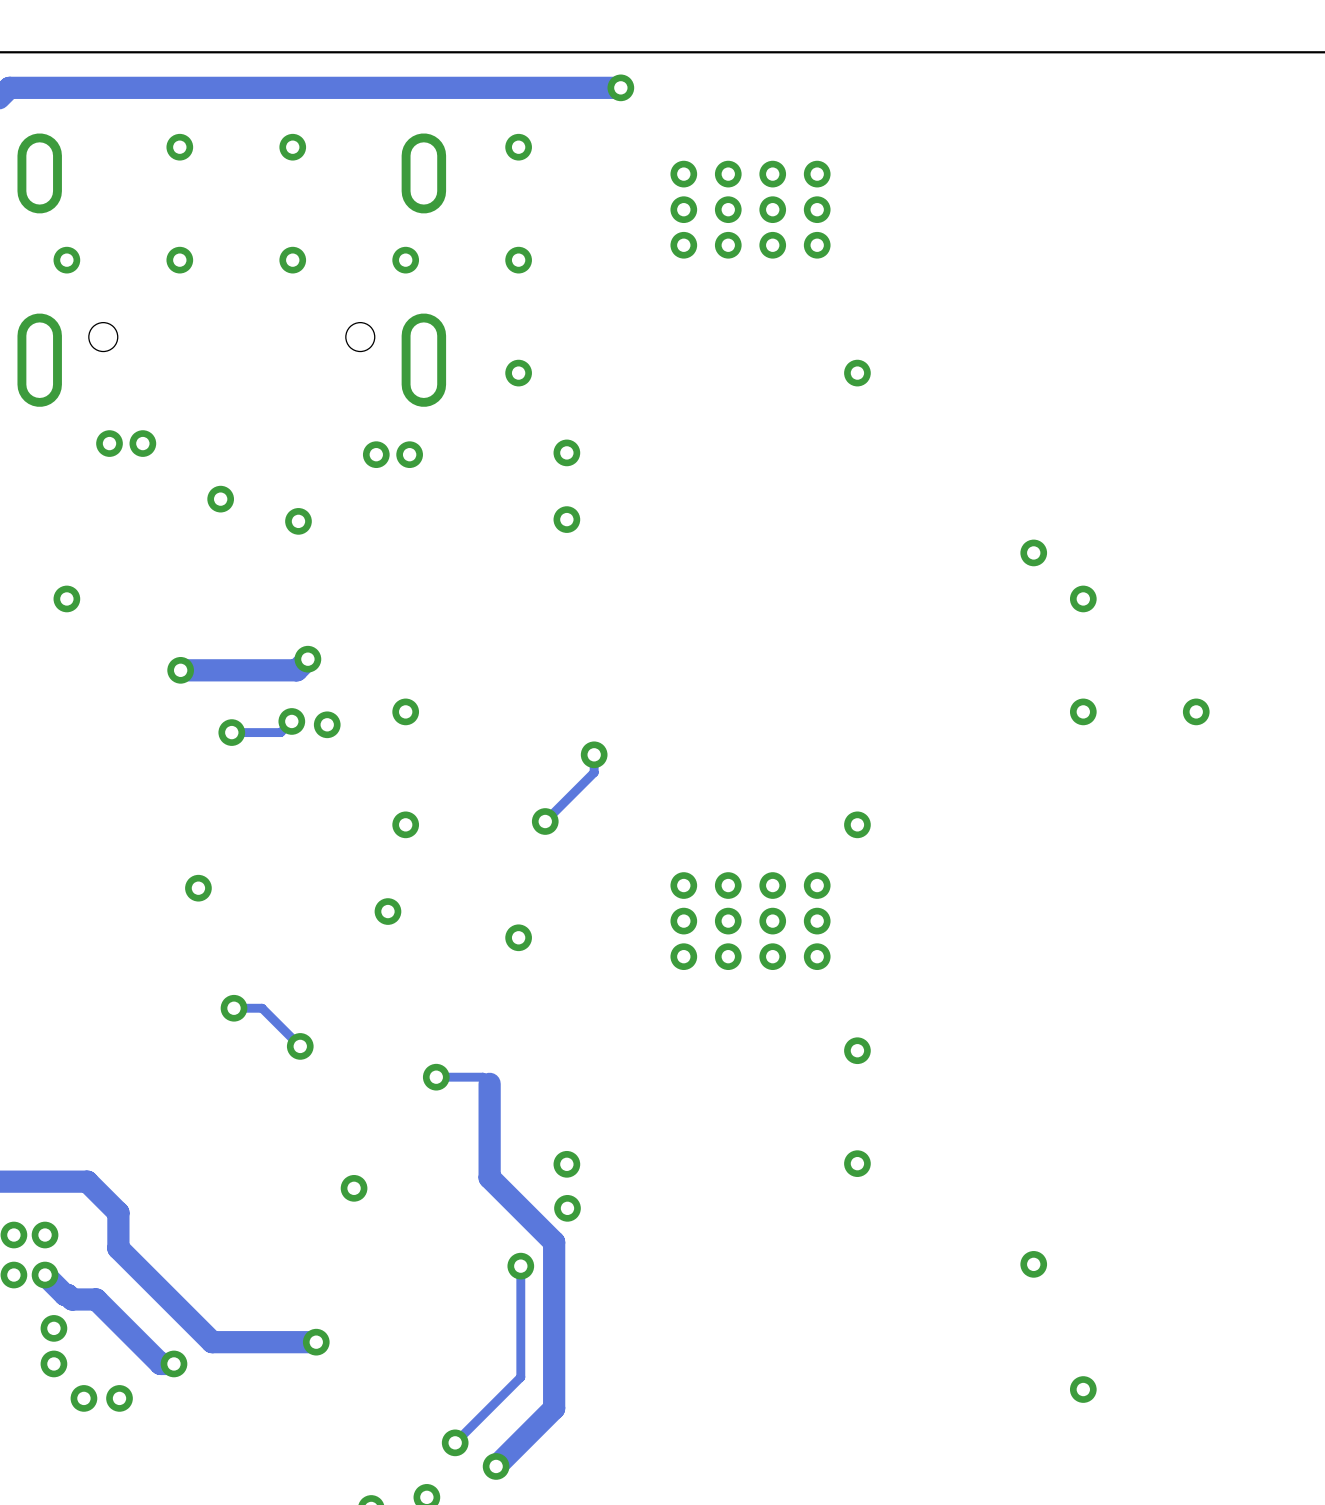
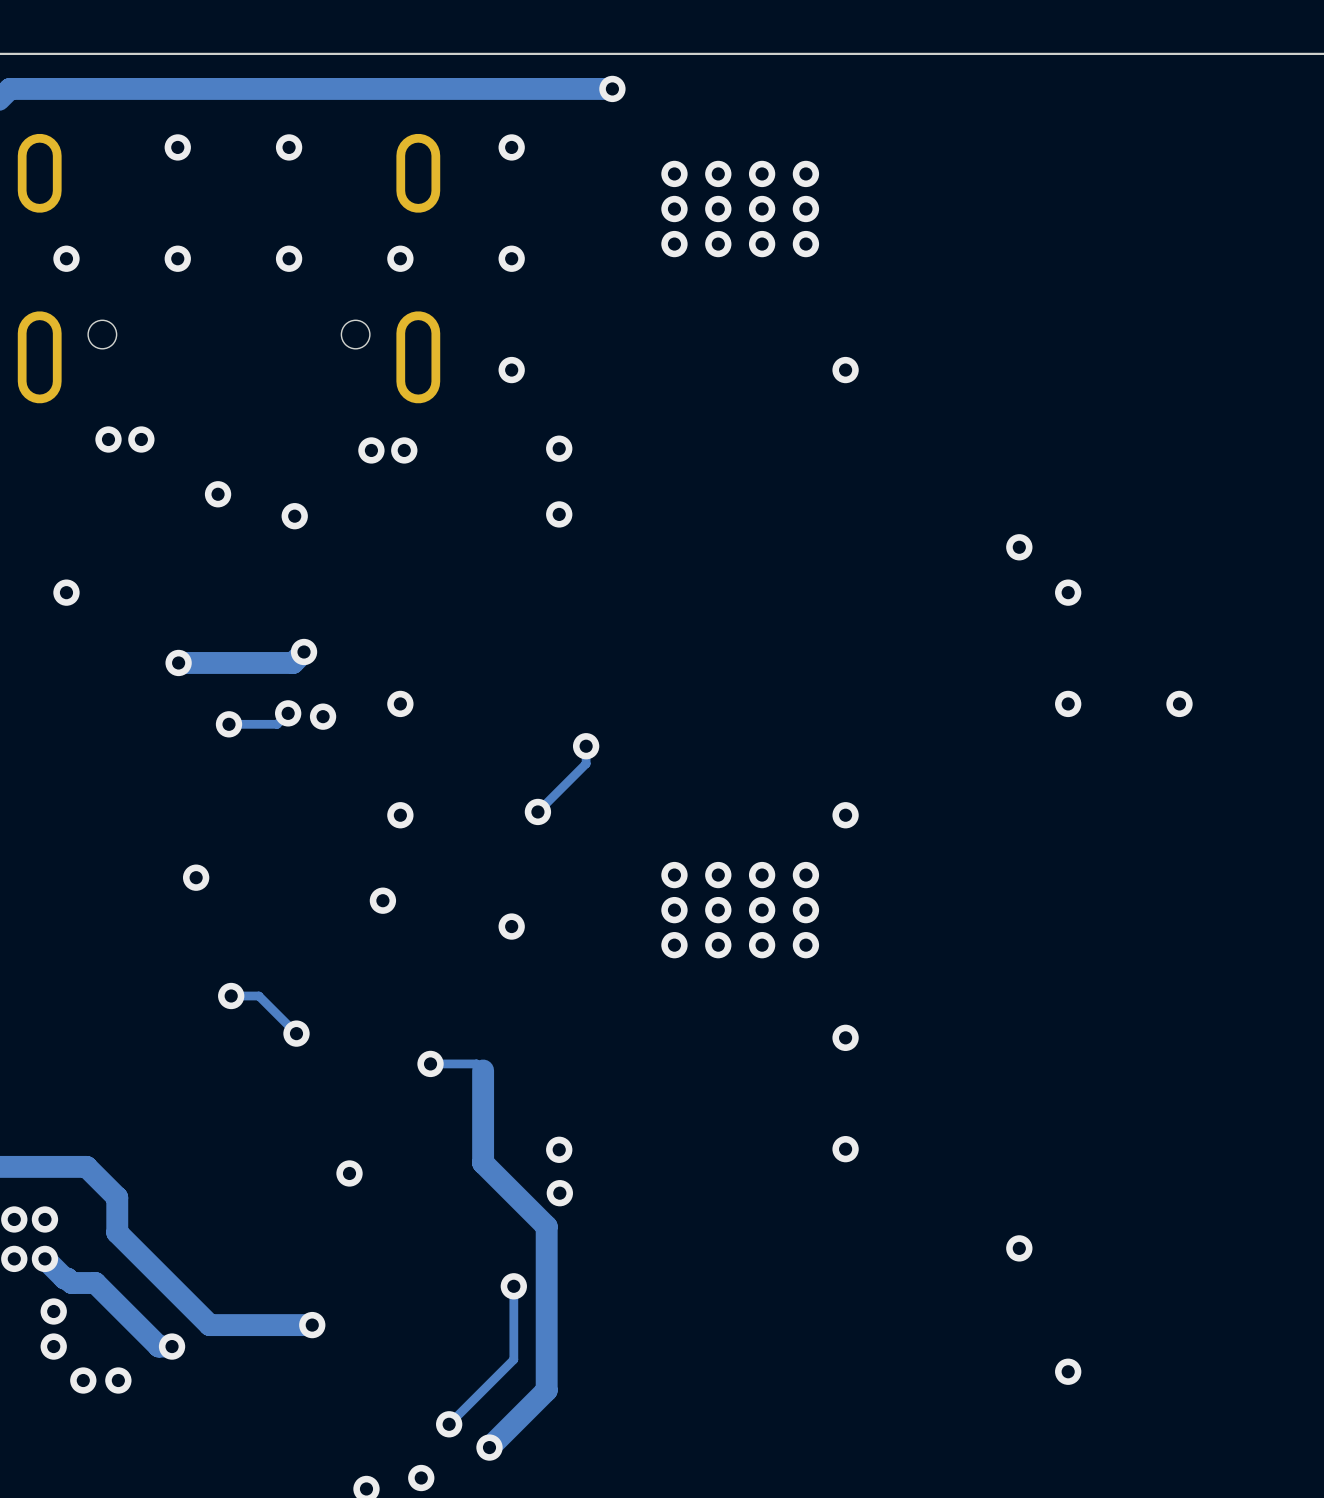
track: (520, 1266) (520, 1302) -> none
via position: (520, 1266) -> (513, 1286)

